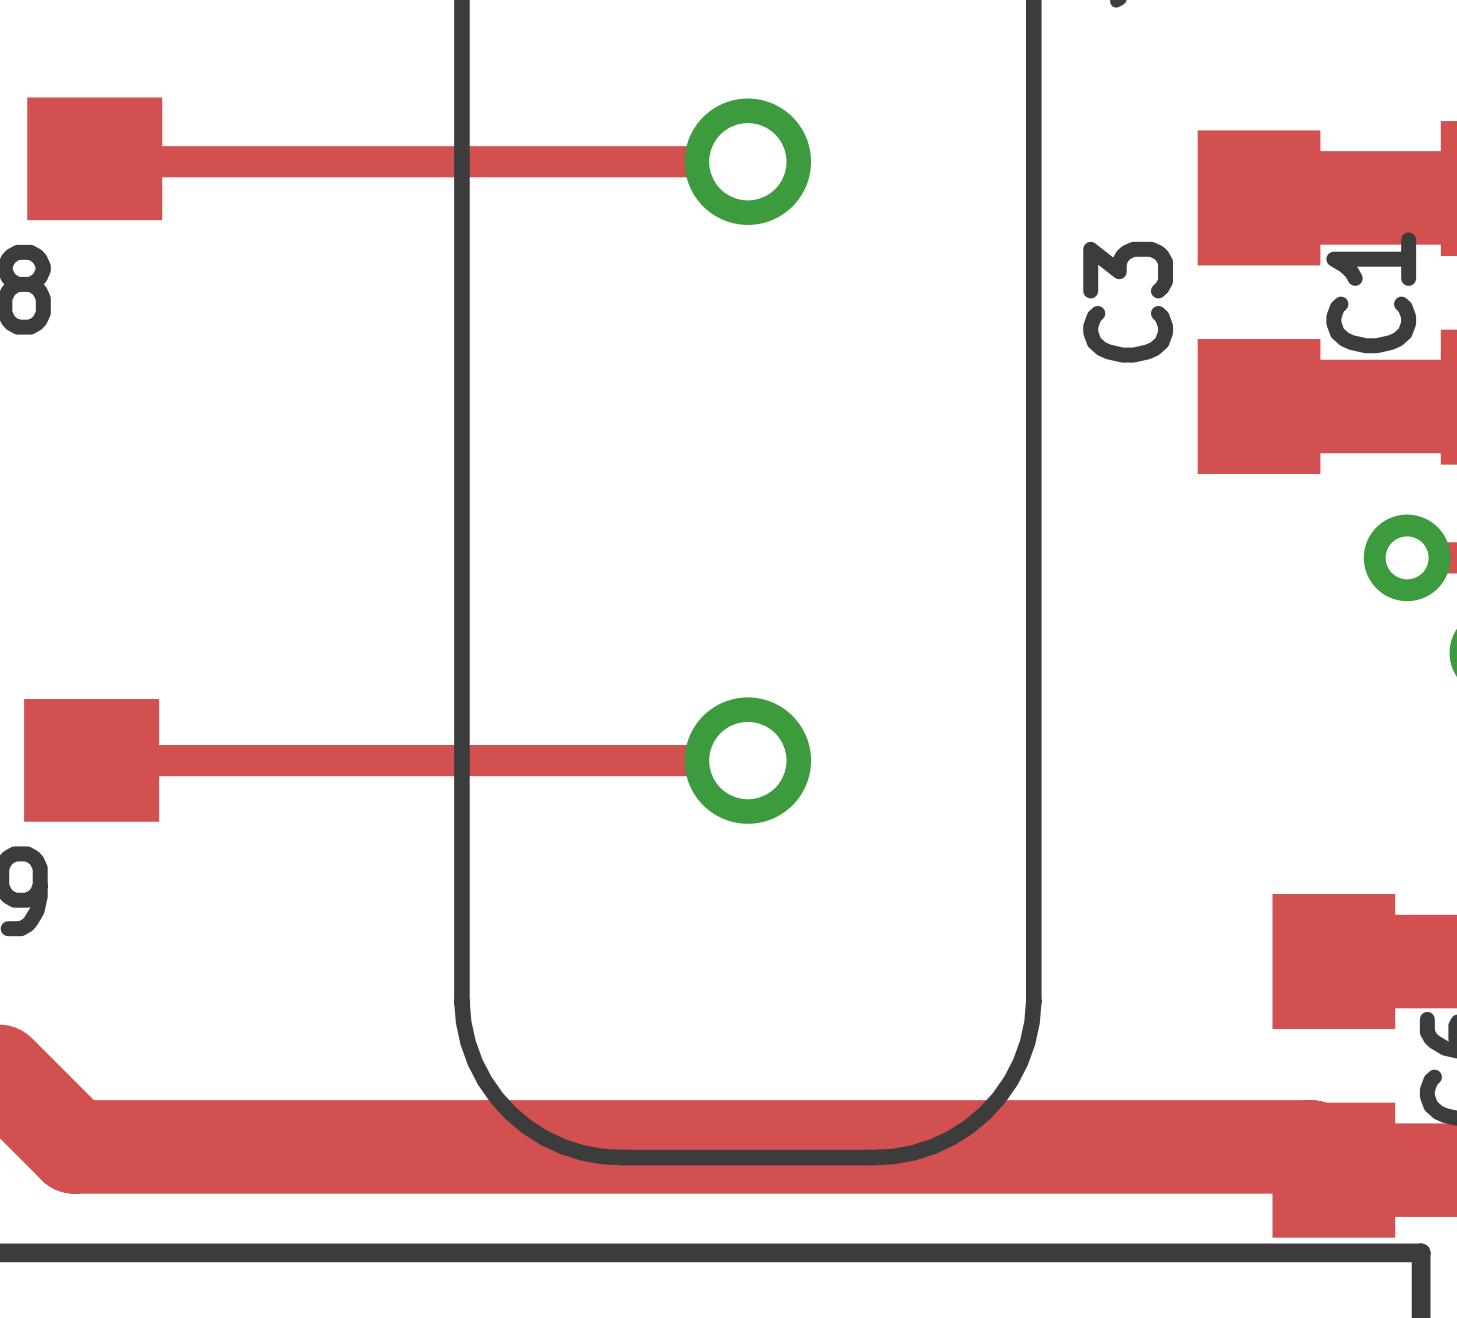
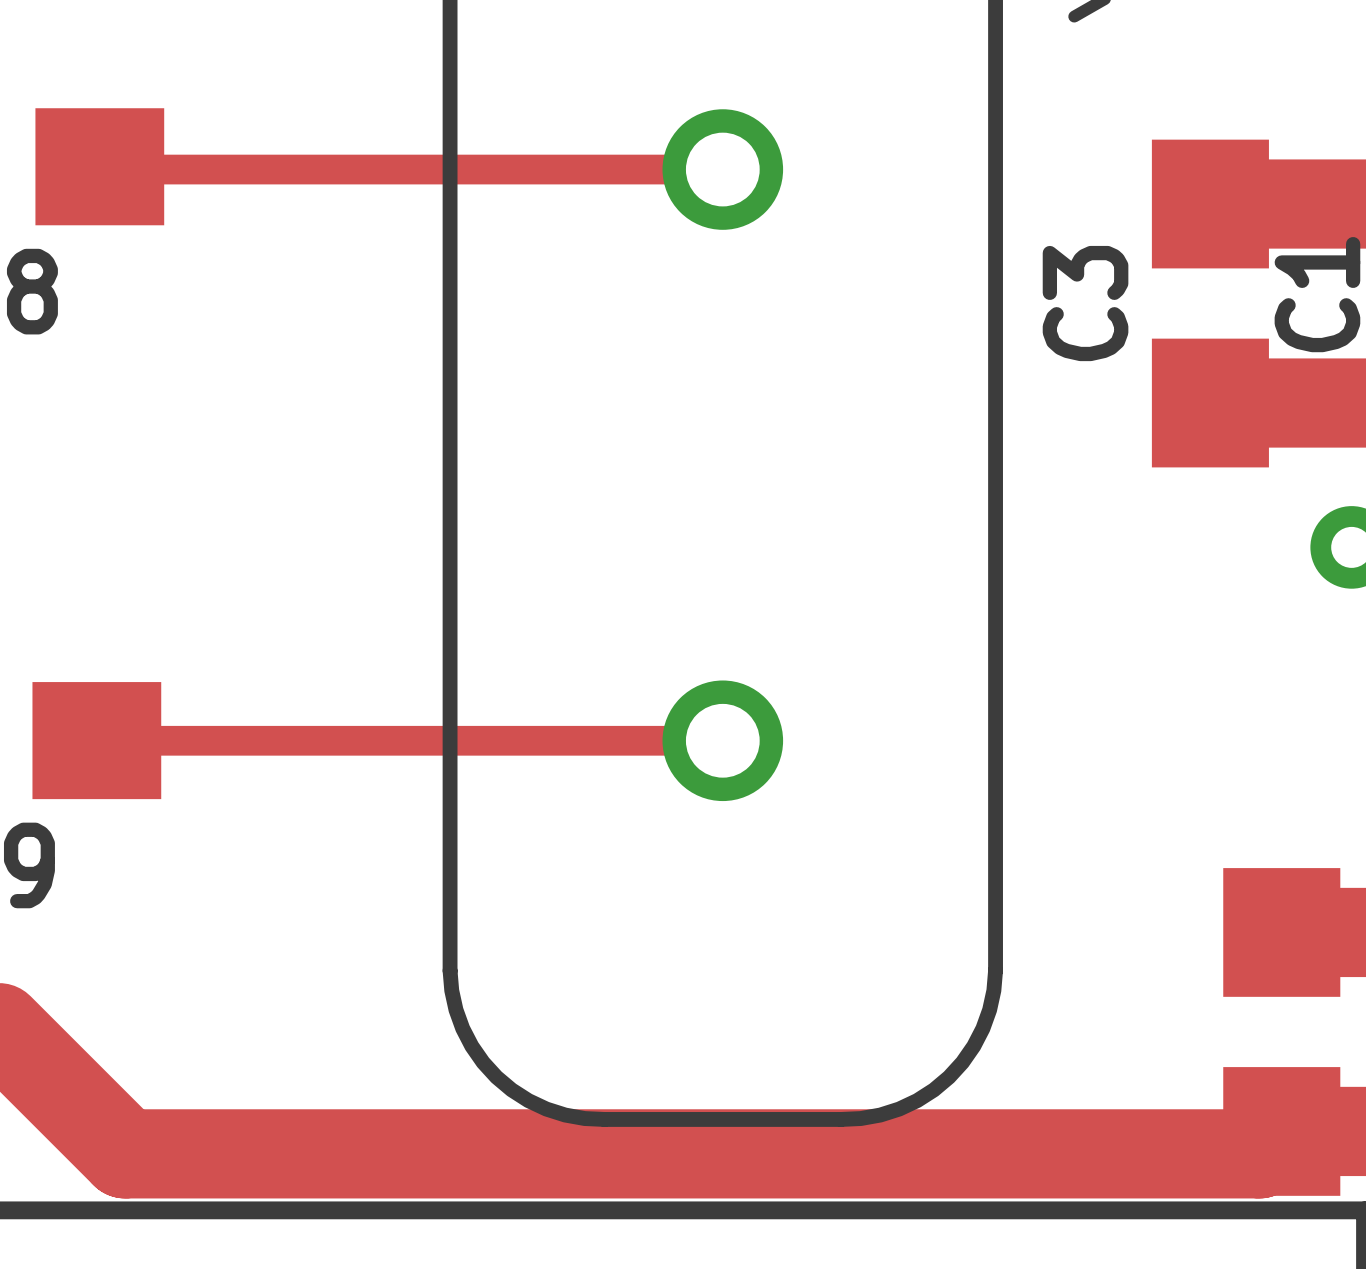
track: (74, 1146) (1310, 1146) (1333, 1170) -> (80, 1109) (125, 1153) (1259, 1153) (1281, 1131)

